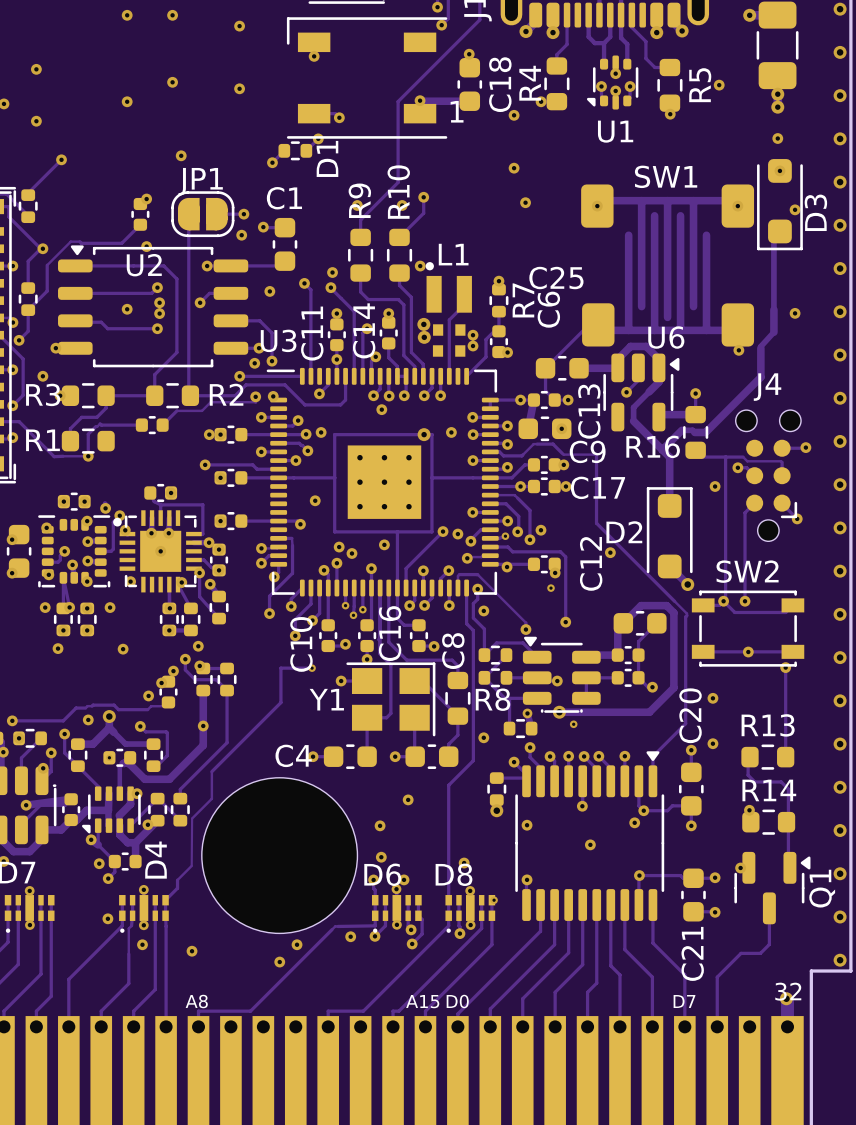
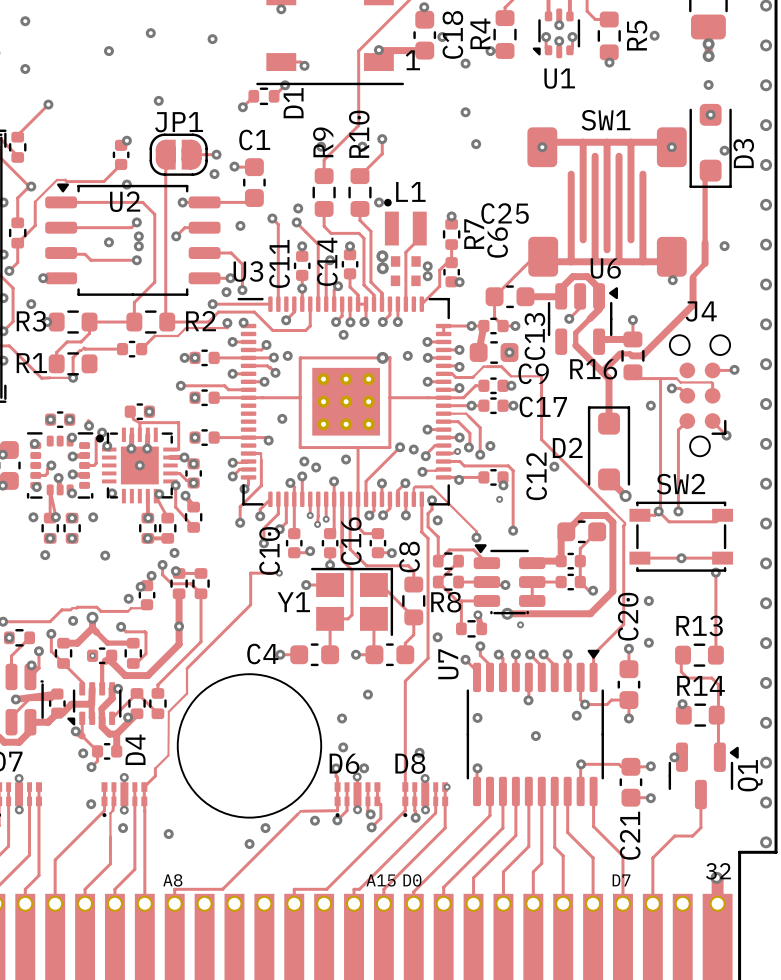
via: none -> (442, 37)
U7 name: none -> U7 (448, 664)
track: (496, 778) (526, 778) -> none
part: (496, 789) -> none
via: (496, 810) -> none

